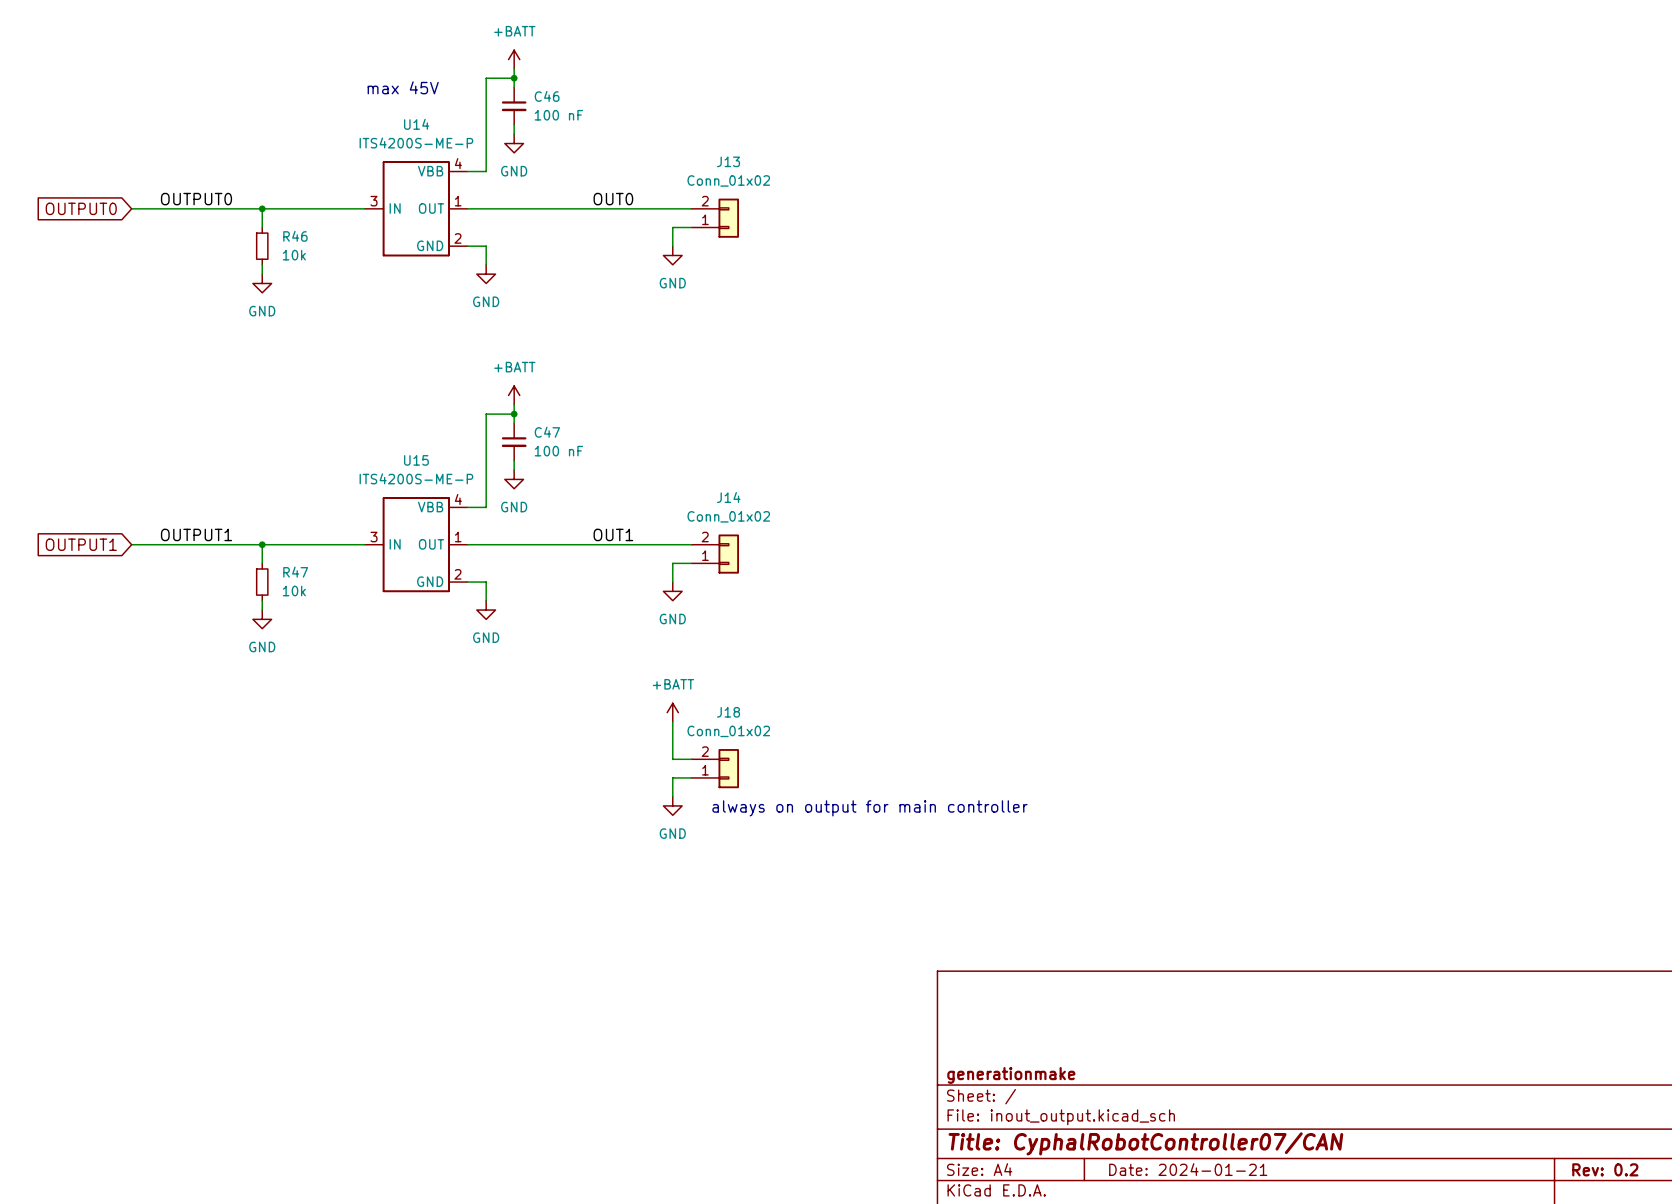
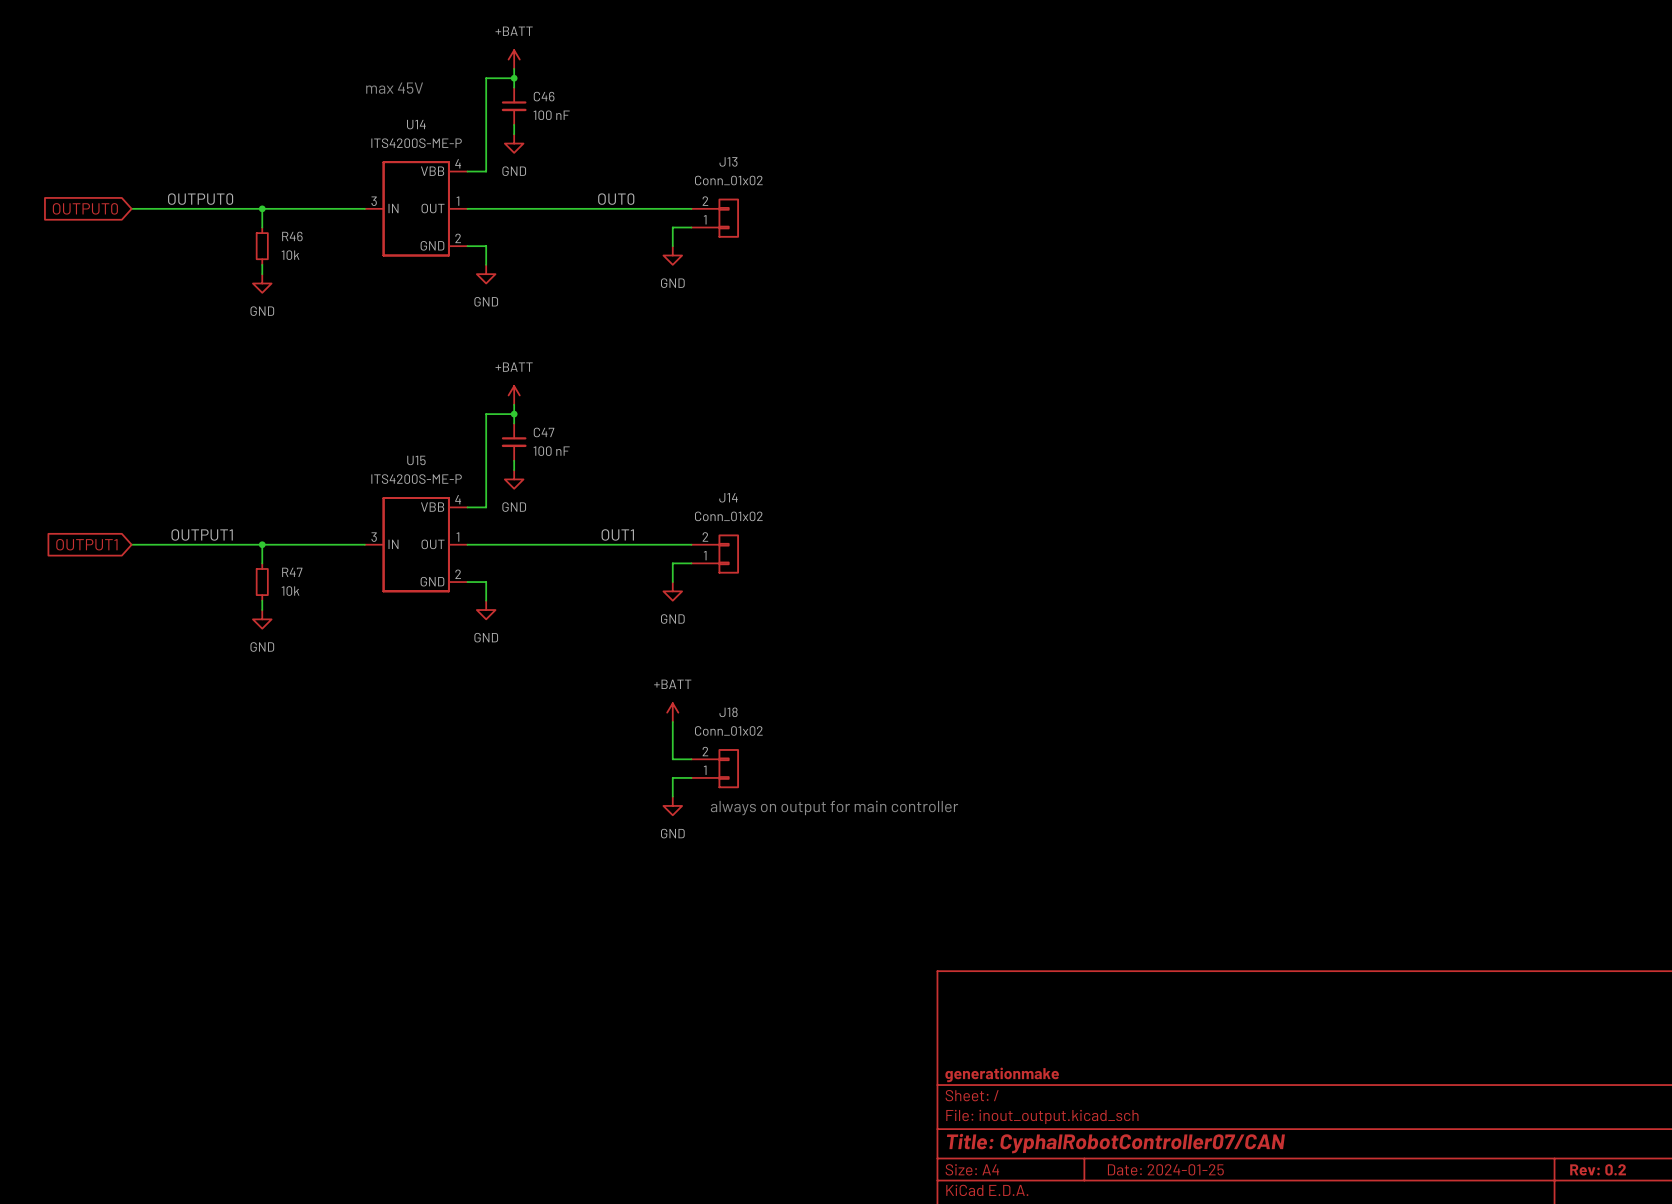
title block: Date: 2024-01-21 (1188, 1169) -> Date: 2024-01-25 (1165, 1169)

